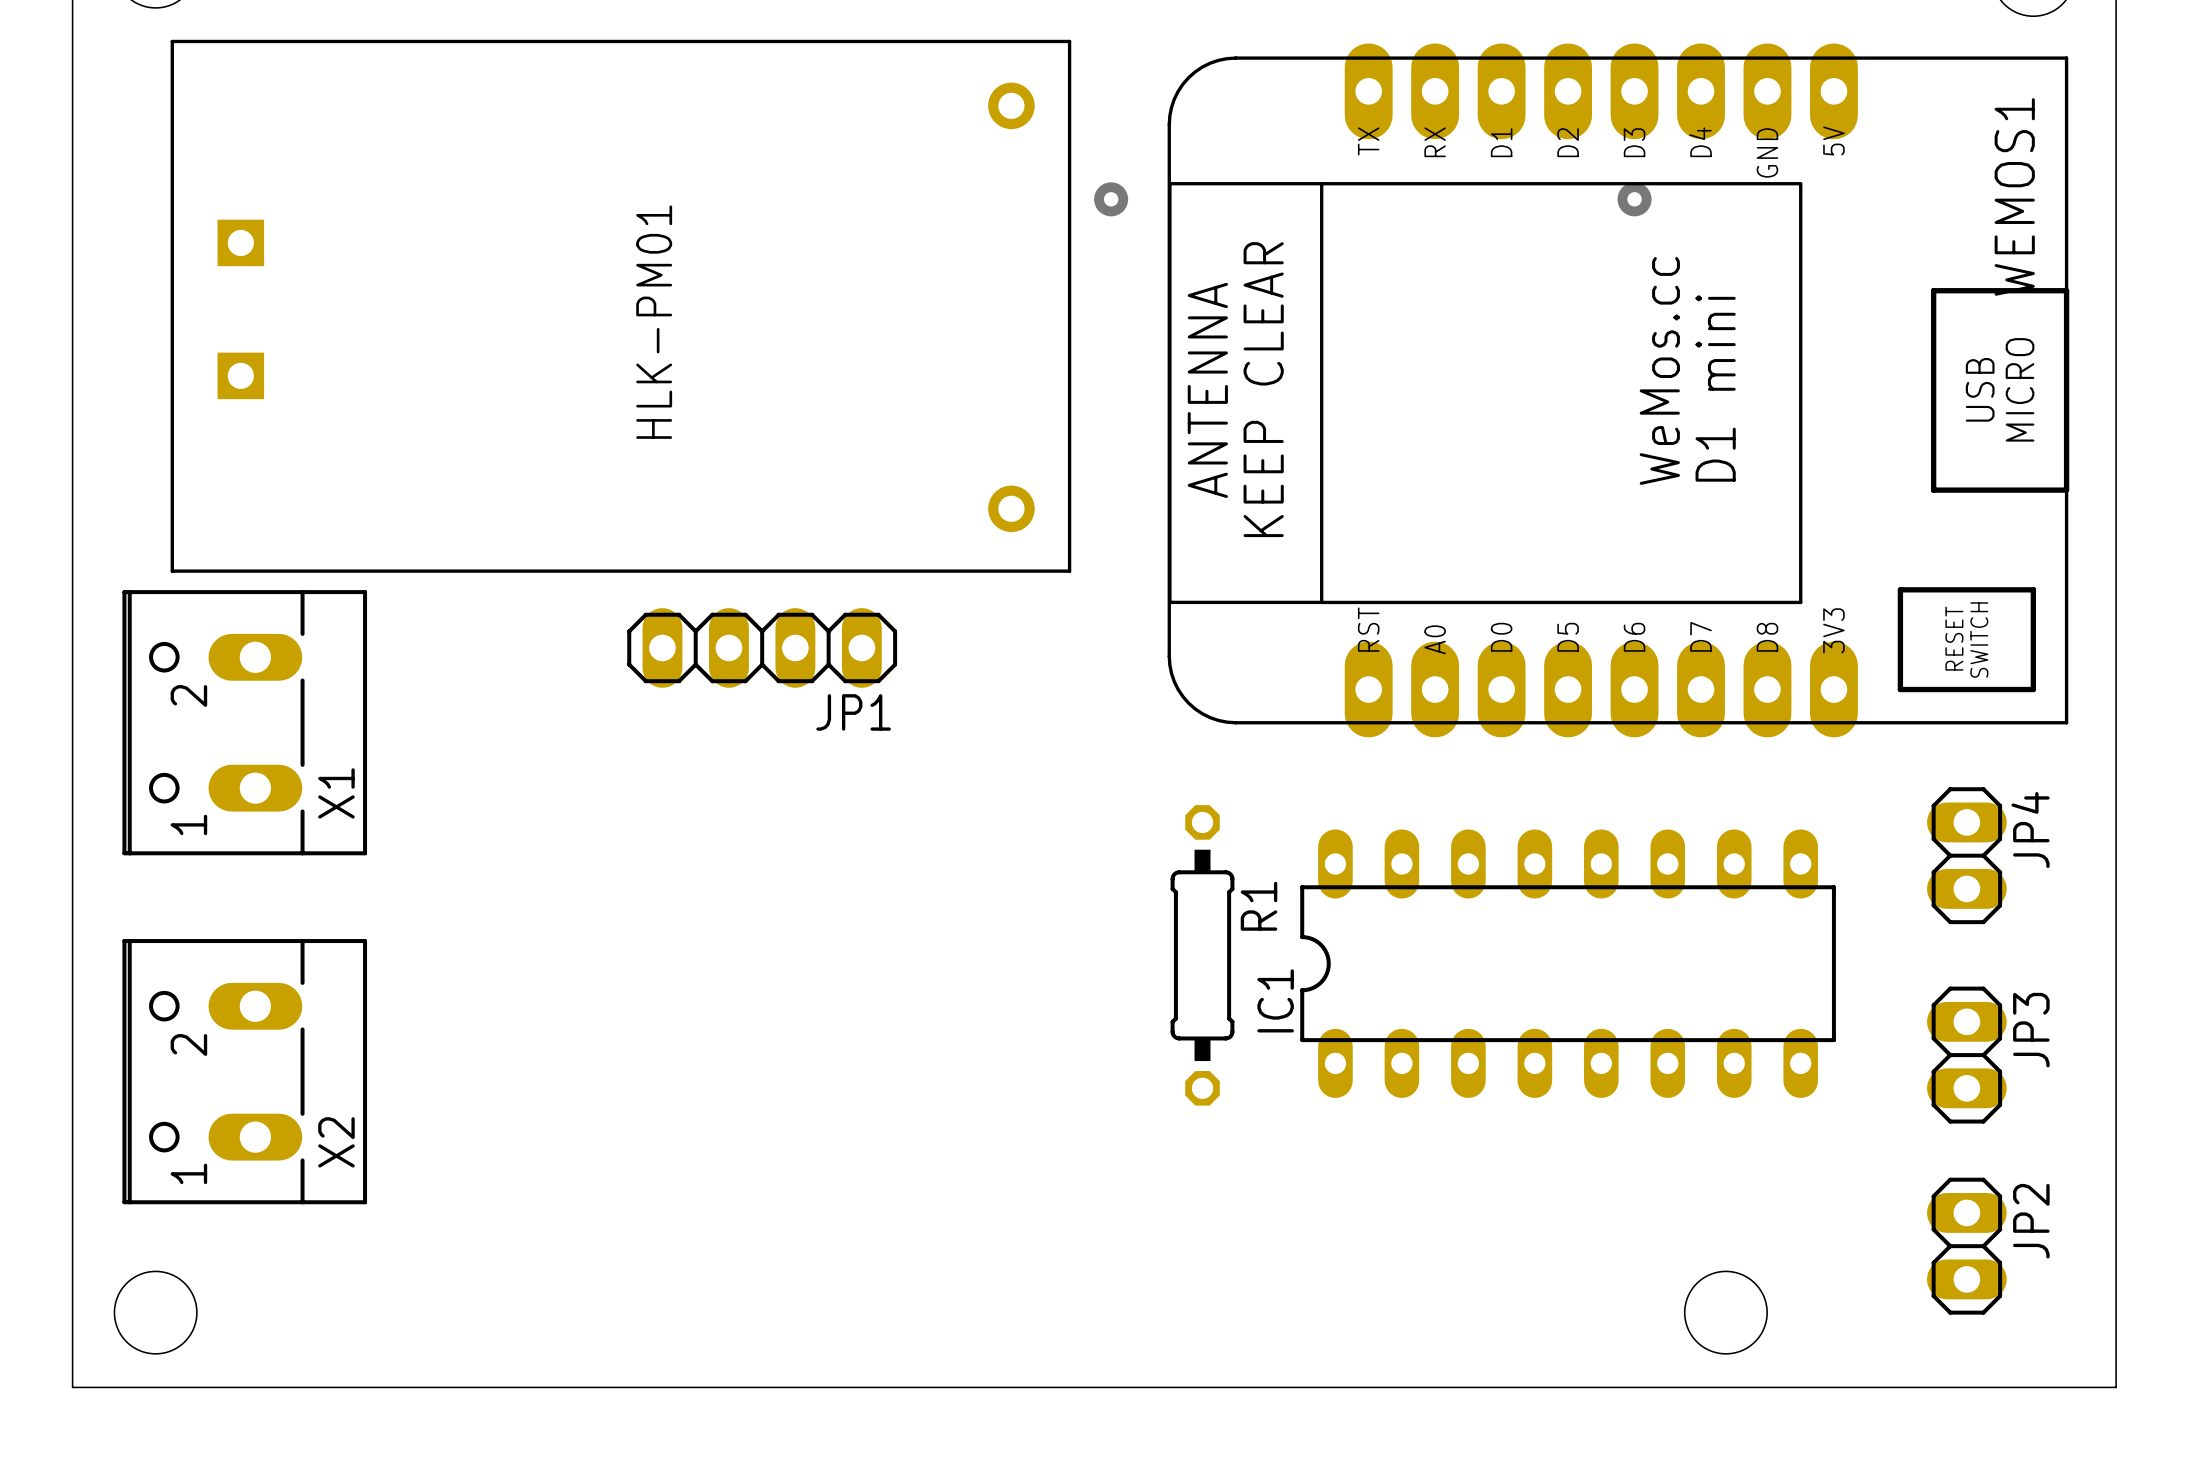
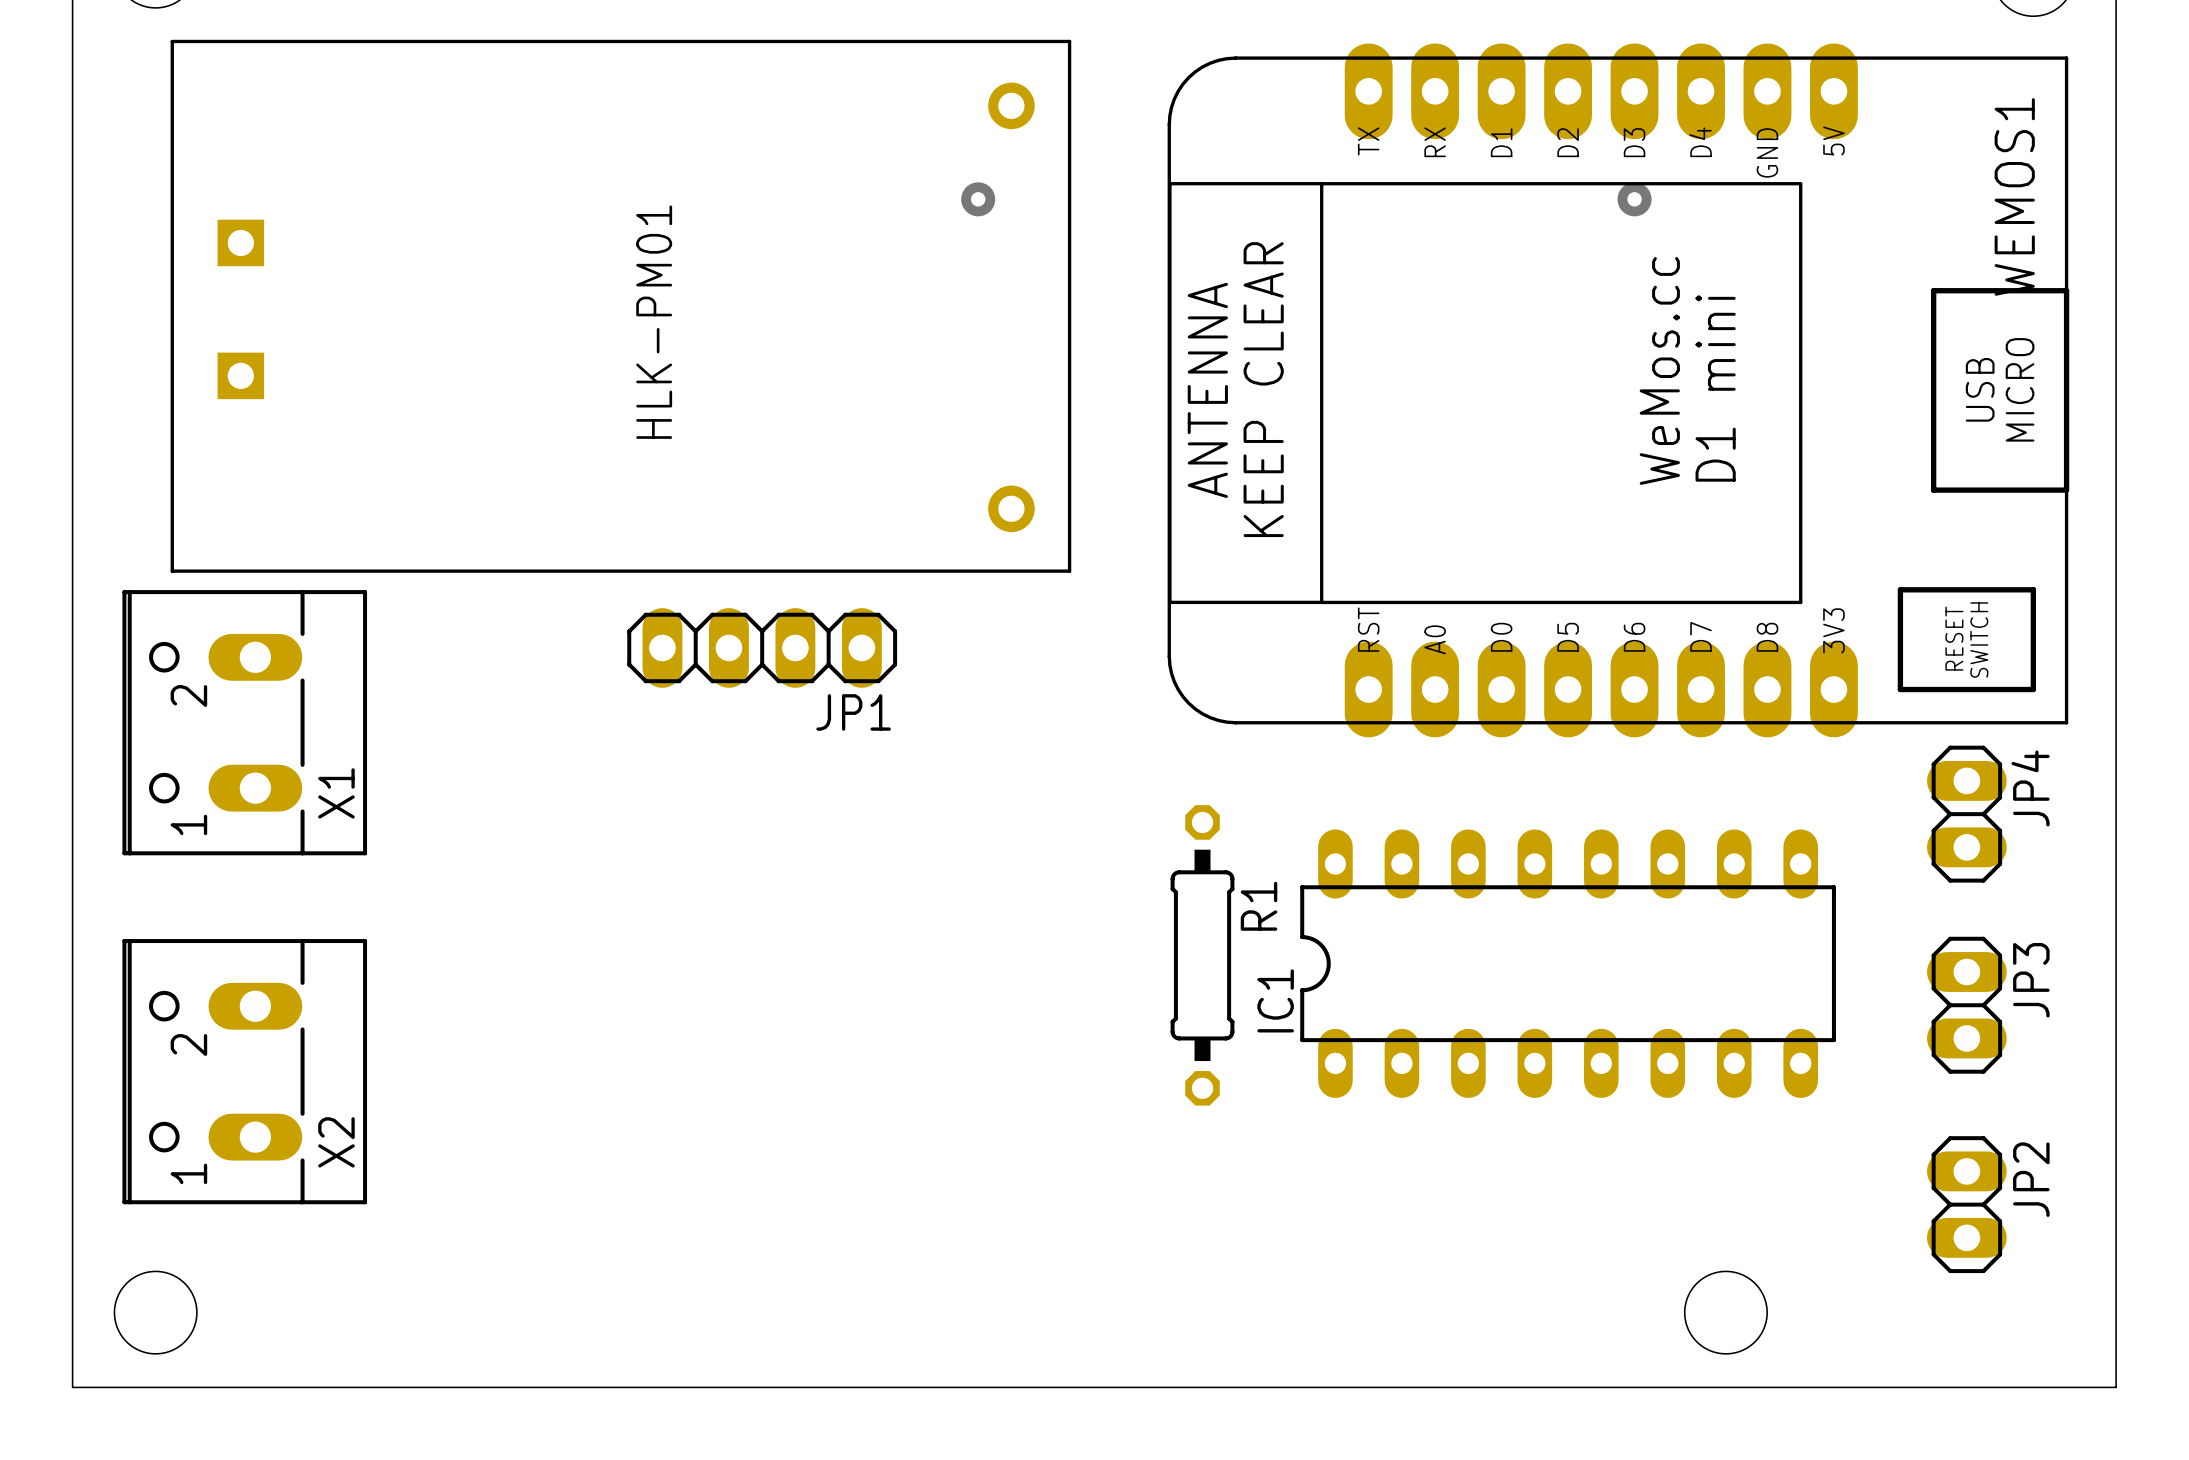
via position: (1111, 199) -> (978, 199)
JP4 position: (1966, 855) -> (1966, 814)
JP3 position: (1966, 1055) -> (1966, 1005)
JP2 position: (1966, 1246) -> (1966, 1204)

